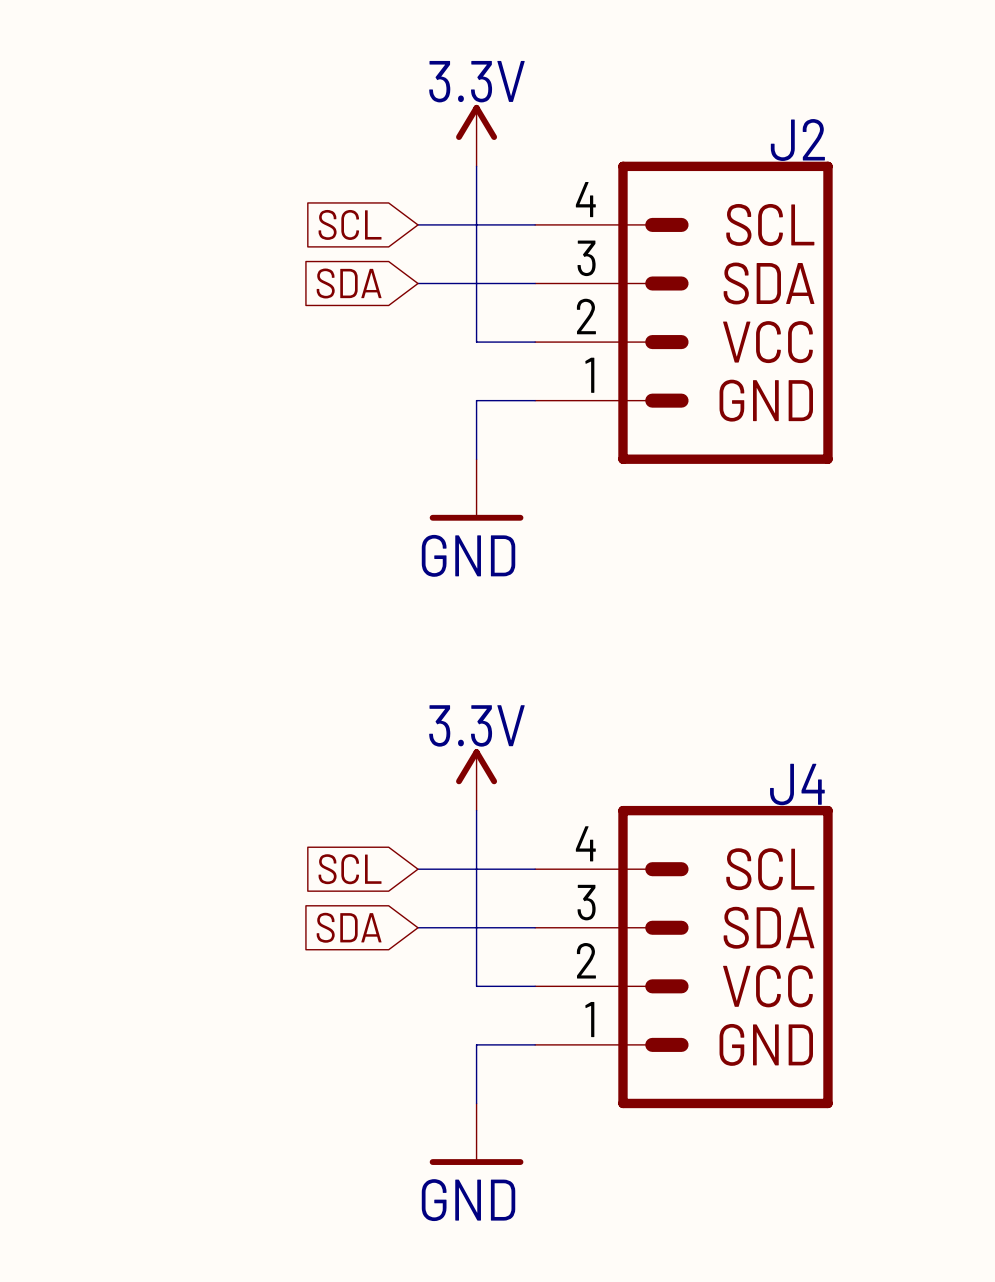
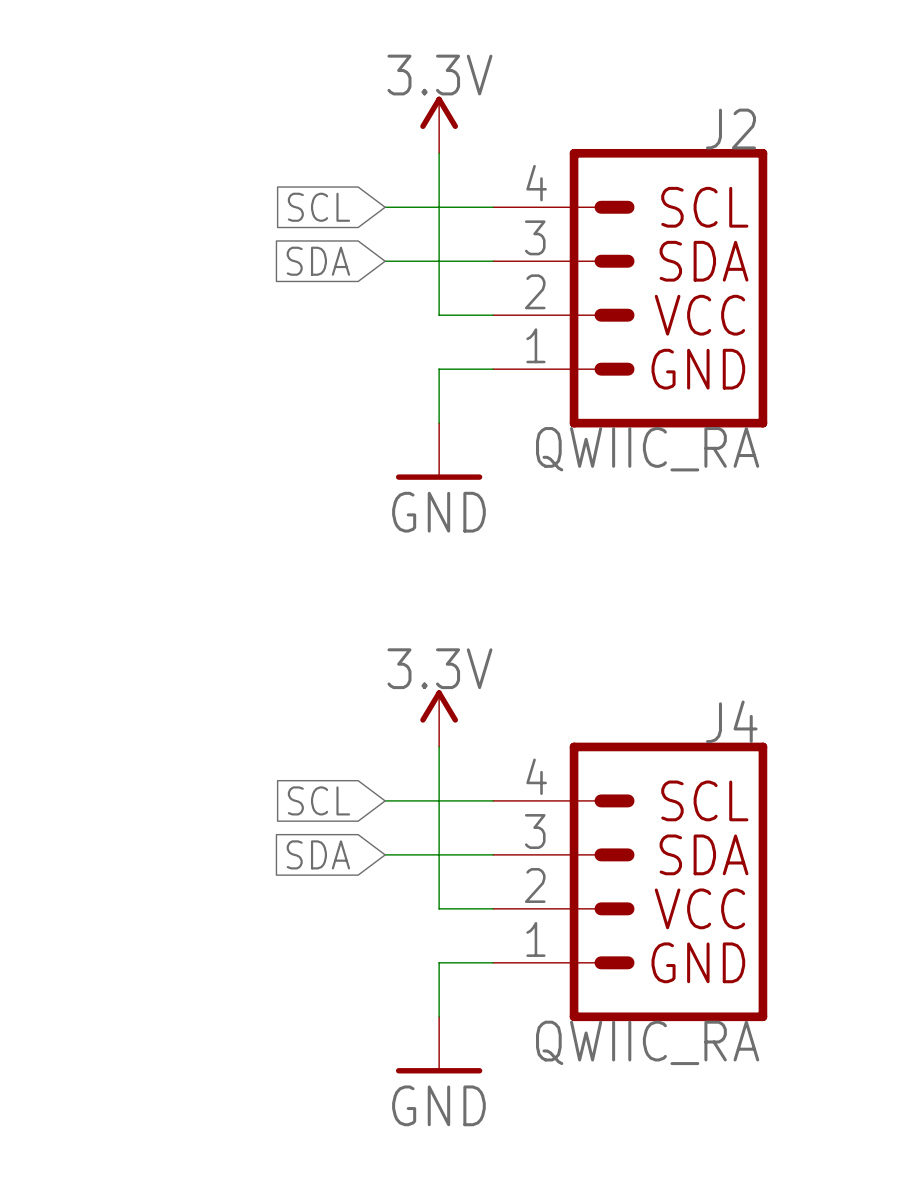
J2 value: none -> QWIIC_RA (647, 449)
J4 value: none -> QWIIC_RA (647, 1042)

